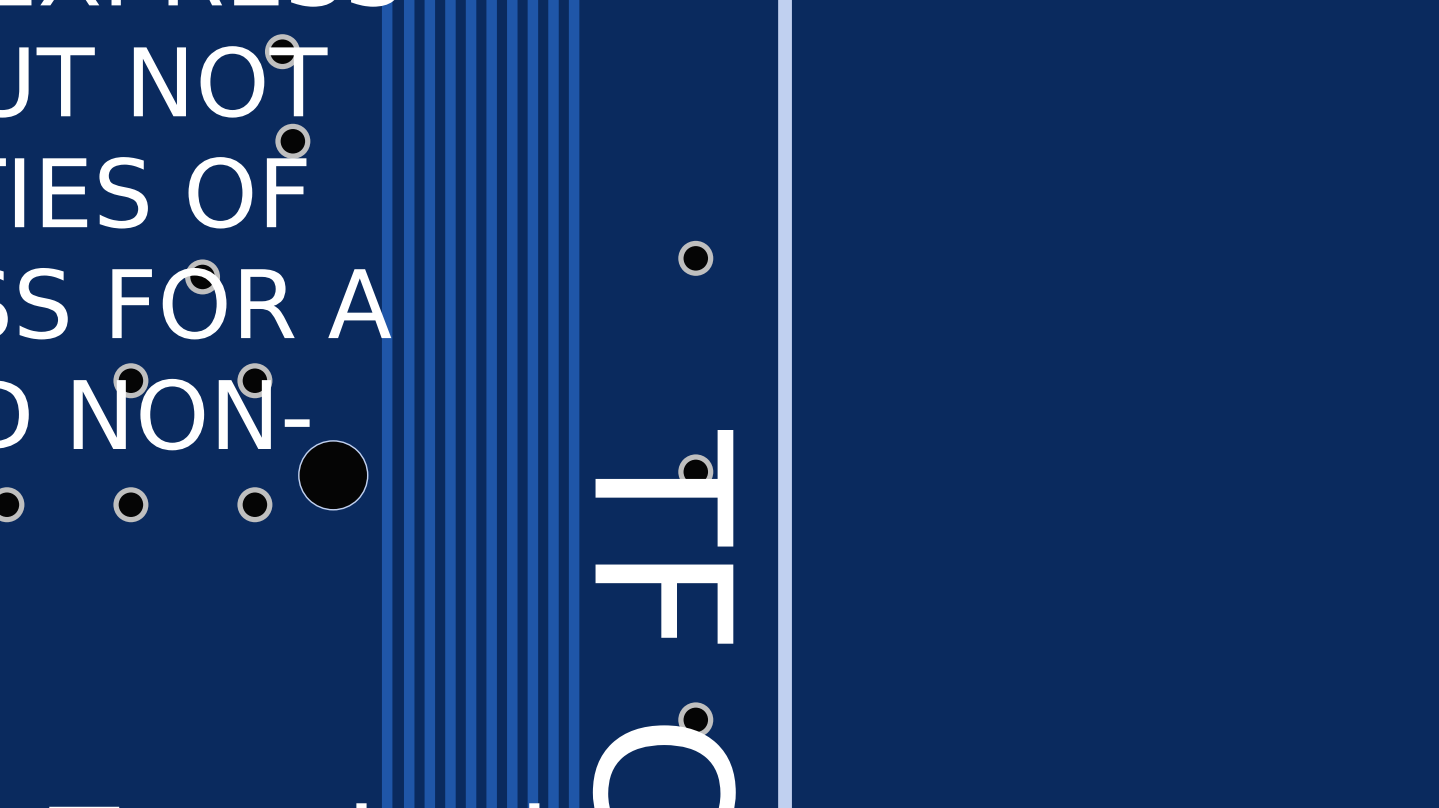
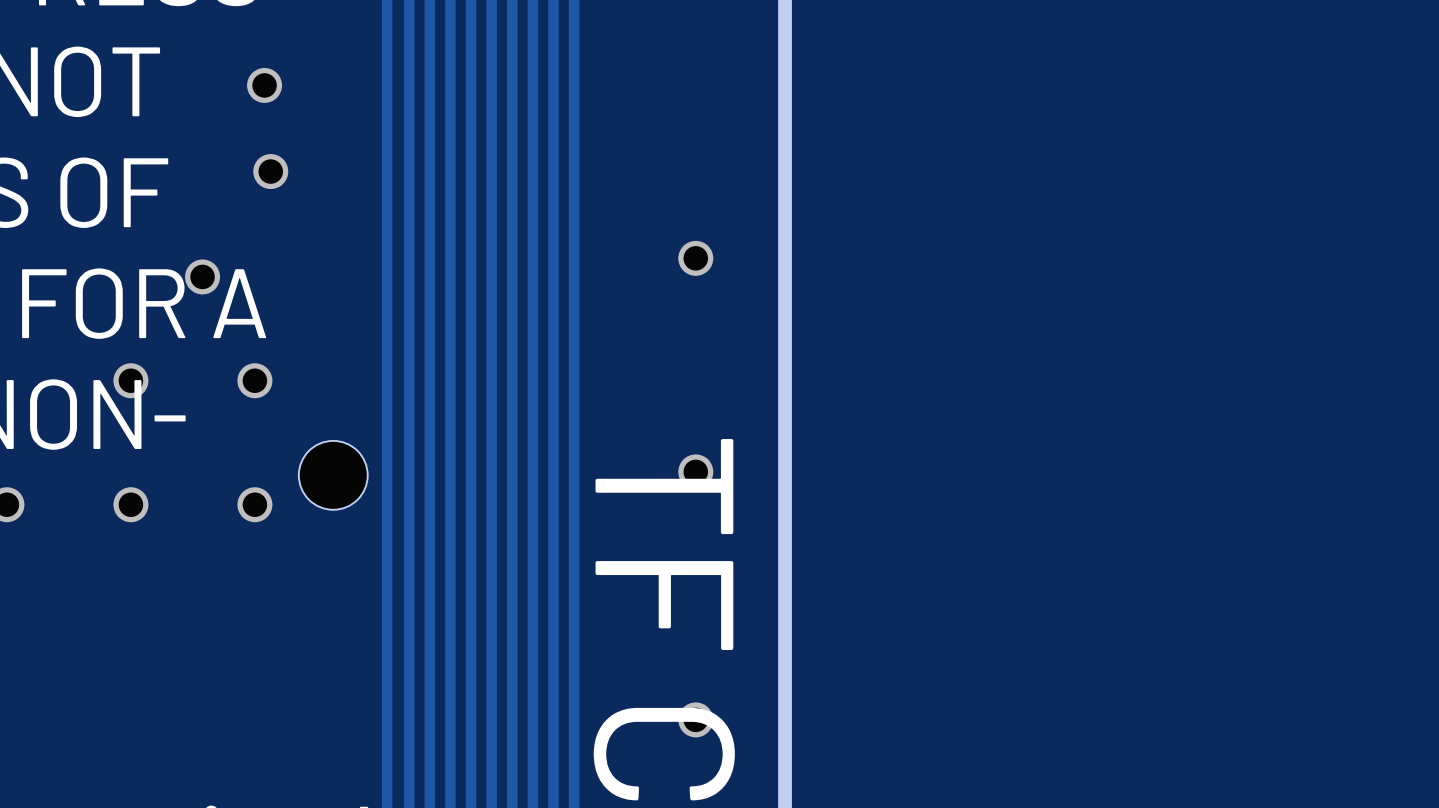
via position: (282, 51) -> (264, 85)
via position: (292, 141) -> (270, 171)

